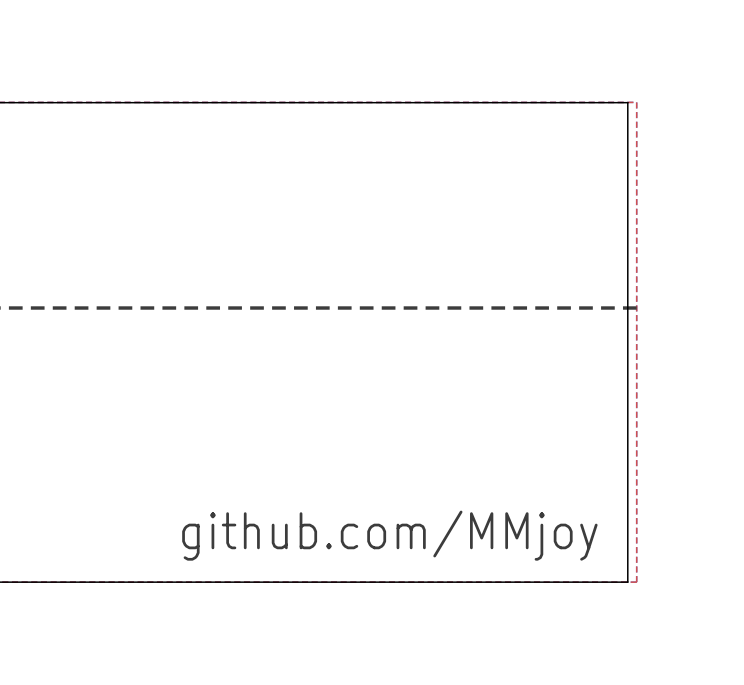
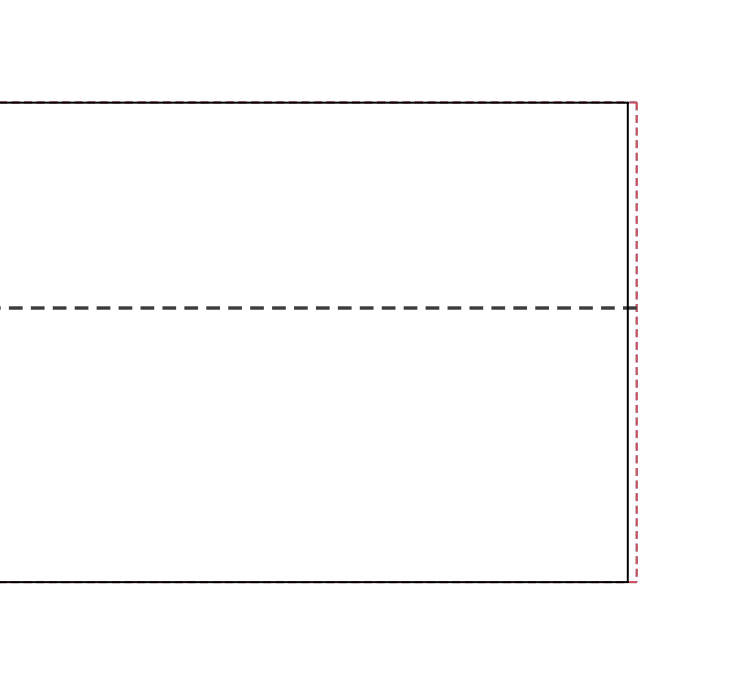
text: github.com/MMjoy (389, 535) -> none

